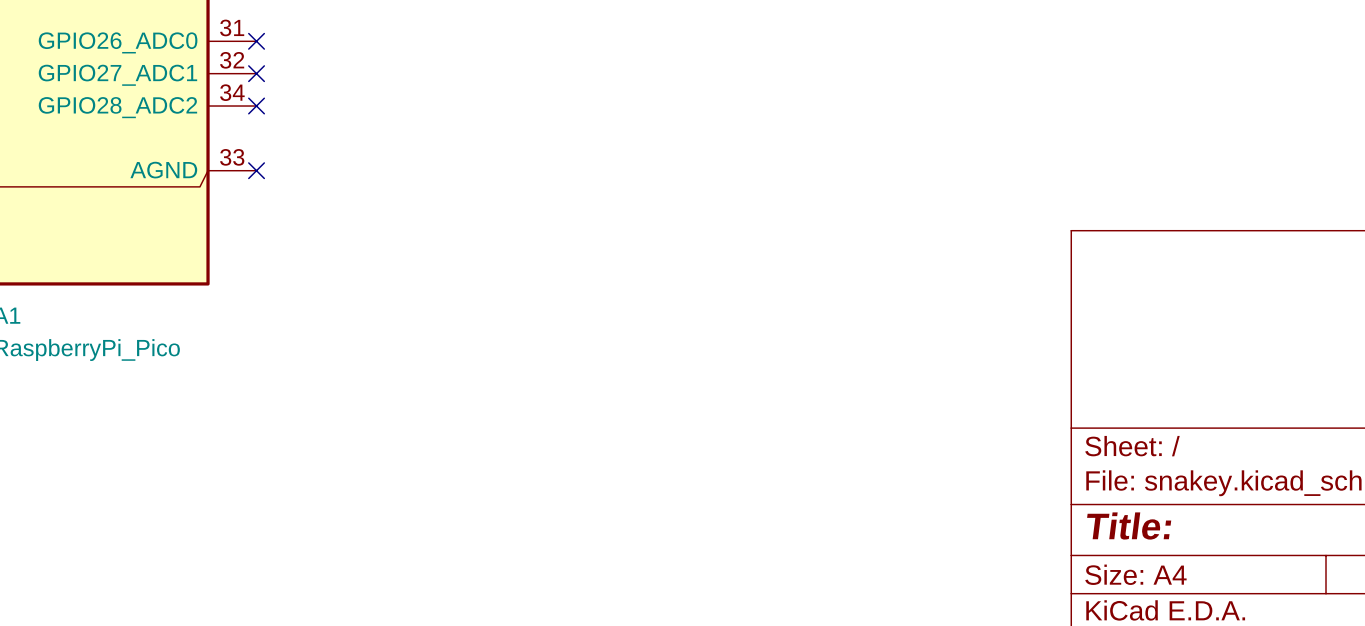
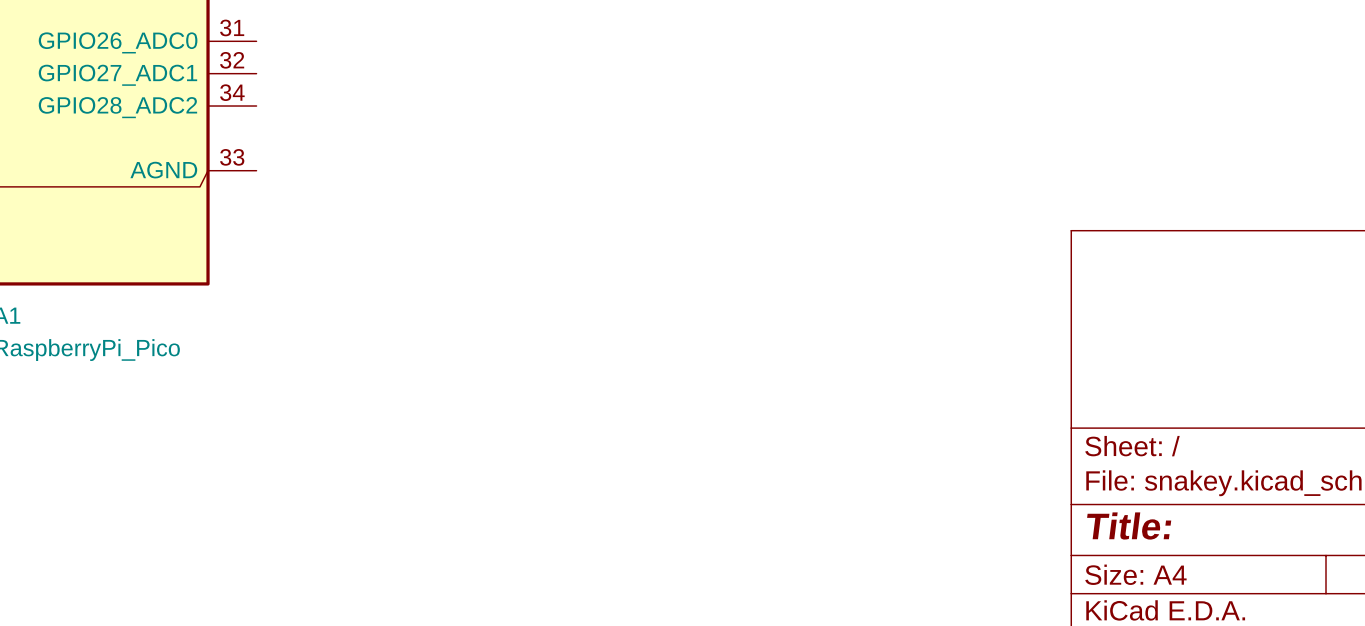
no-connect mark: (256, 41) -> none
no-connect mark: (256, 73) -> none
no-connect mark: (256, 106) -> none
no-connect mark: (256, 170) -> none

